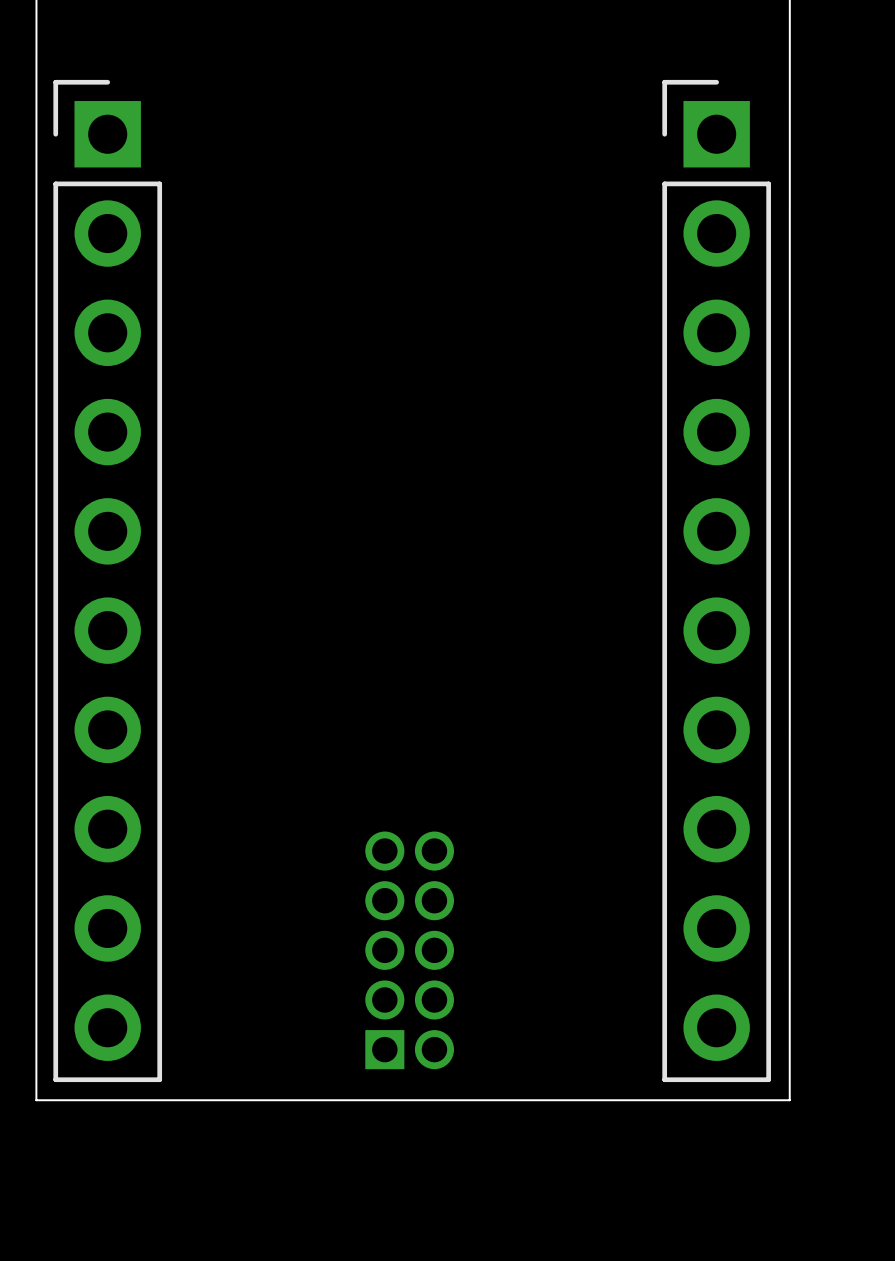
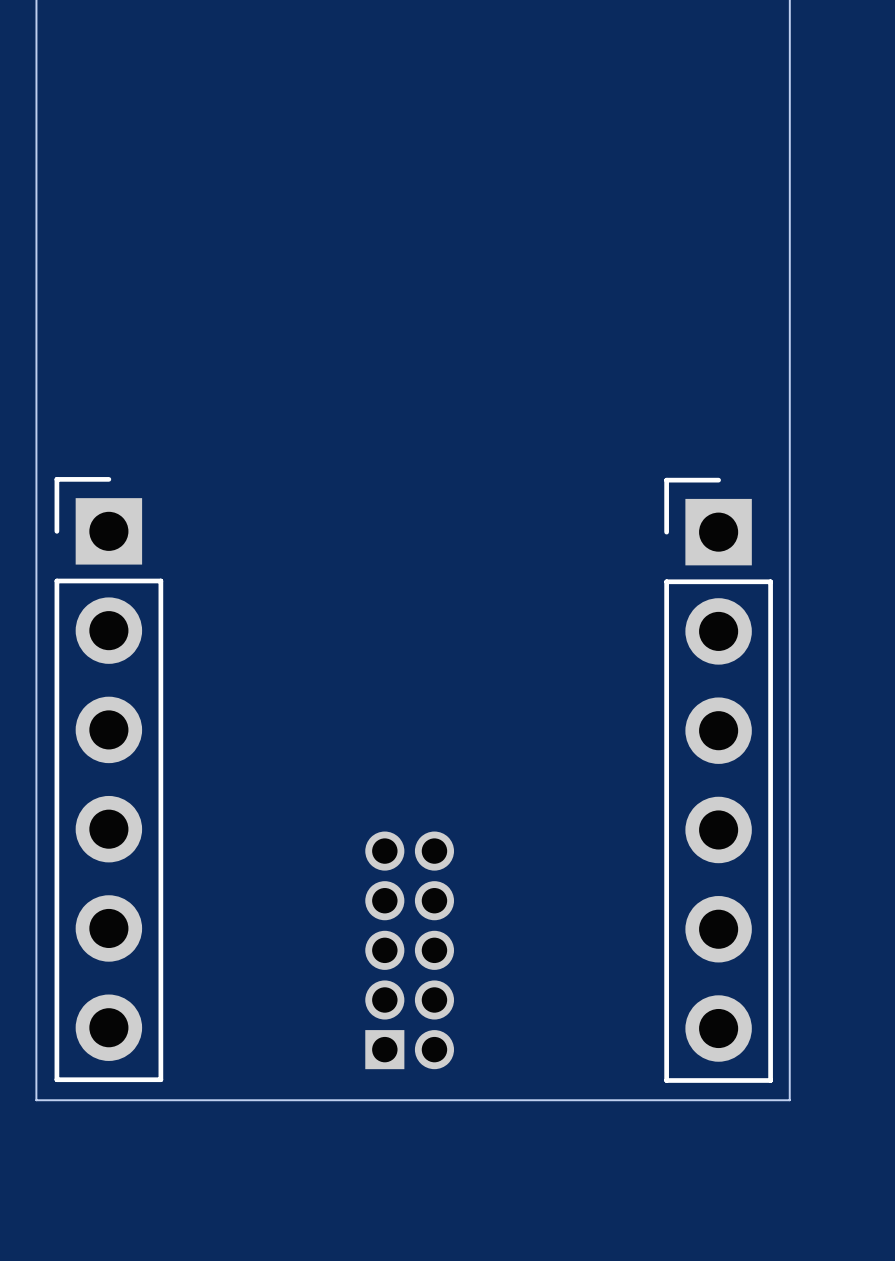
part: (107, 580) -> none
part: (716, 580) -> none
part: none -> (108, 779)
part: none -> (718, 780)

